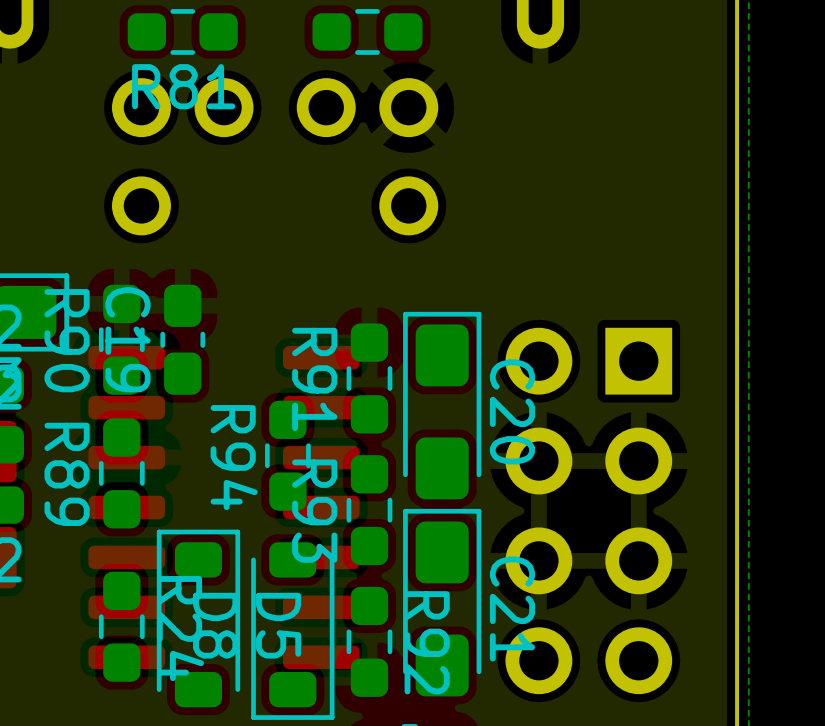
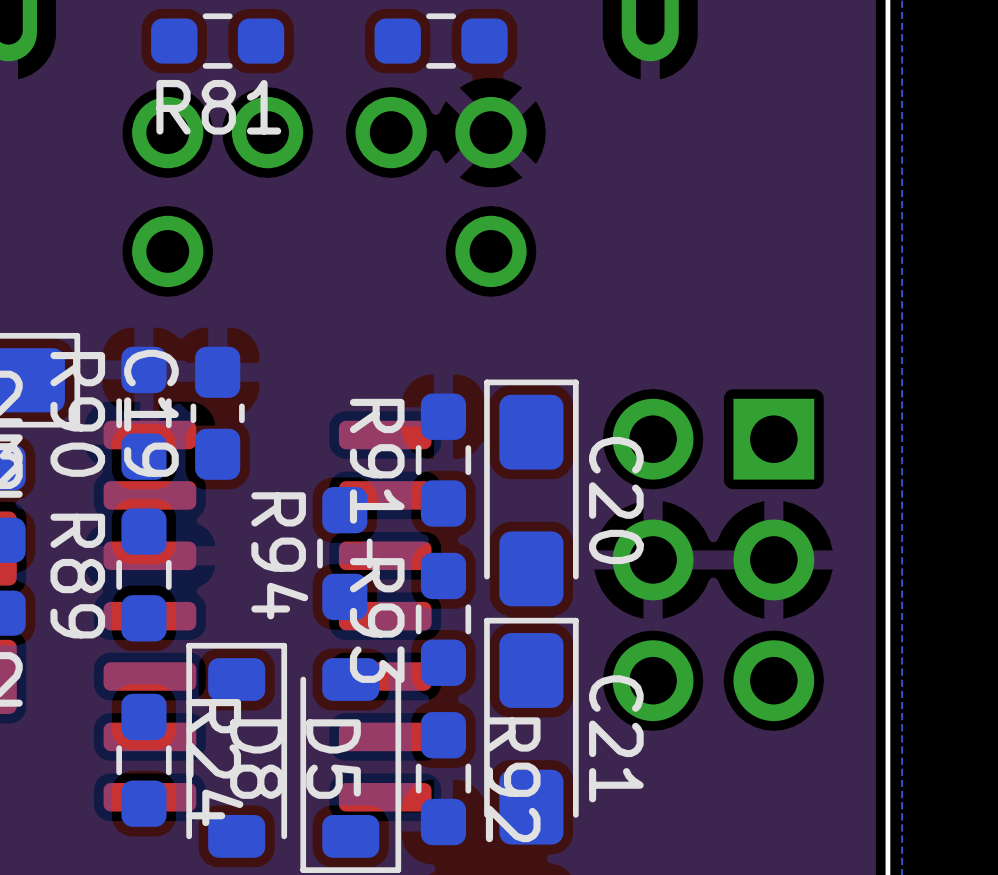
part: none -> (713, 559)
part: (588, 510) -> none

